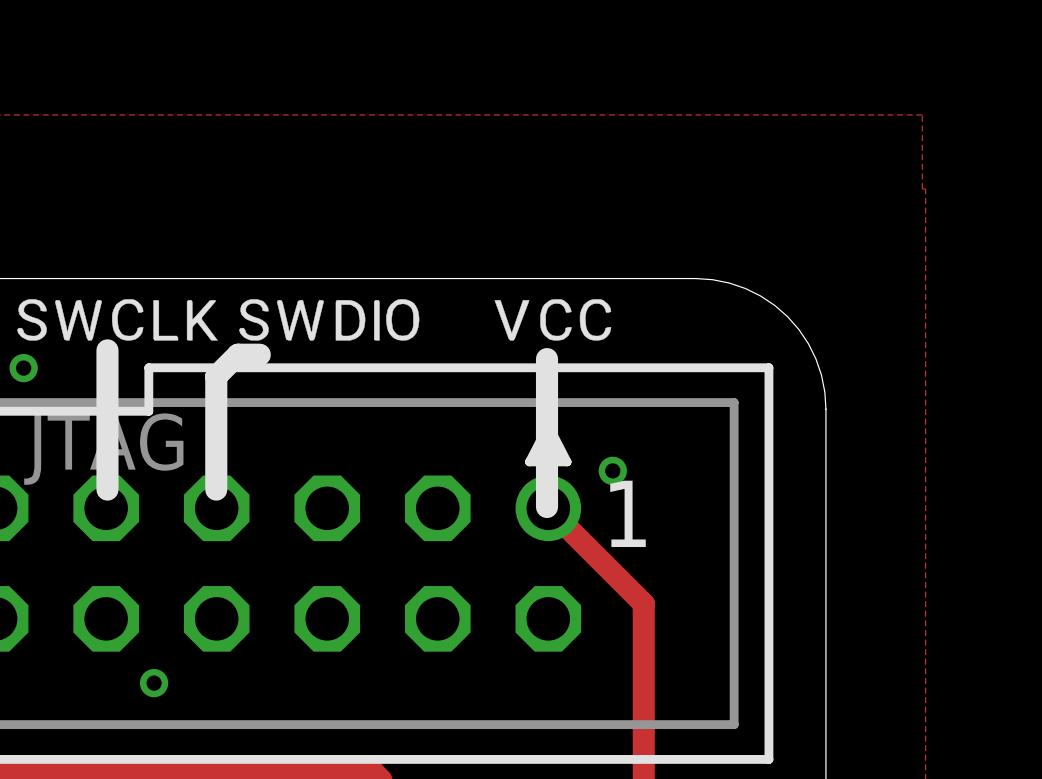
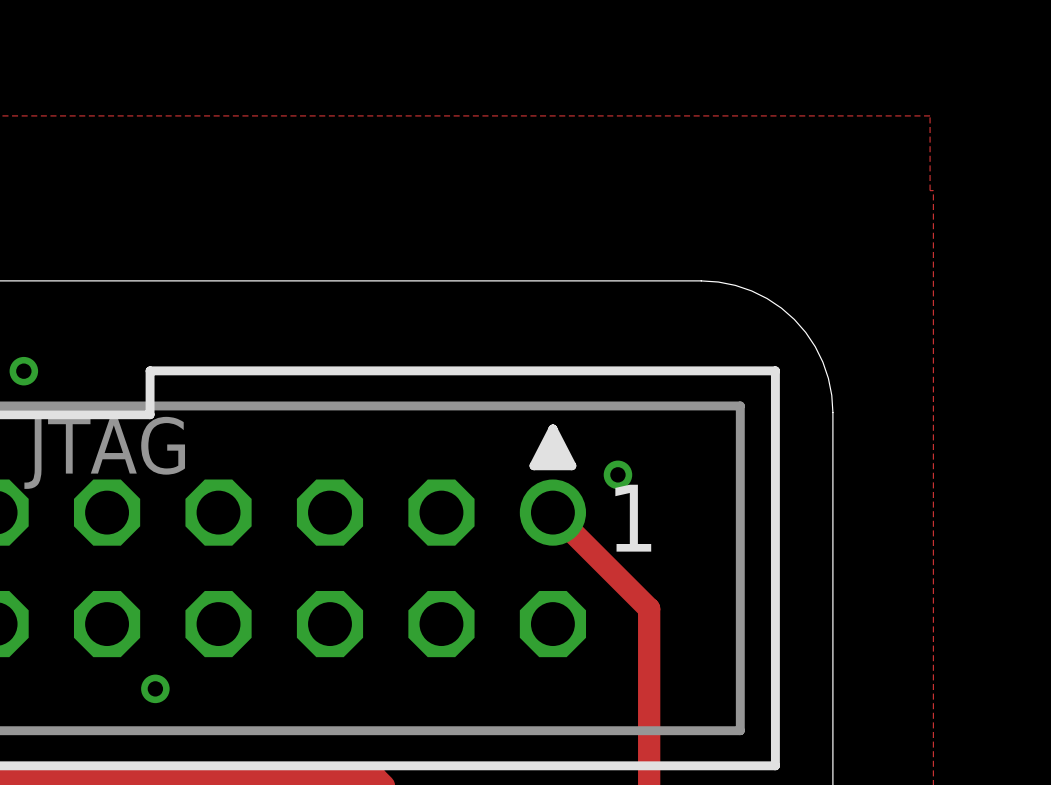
drawing: [17, 299, 420, 341] -> none
drawing: [494, 299, 612, 341] -> none
line: (107, 350) (107, 489) -> none
line: (259, 354) (238, 354) (216, 376) (216, 489) -> none
line: (547, 359) (547, 507) -> none

